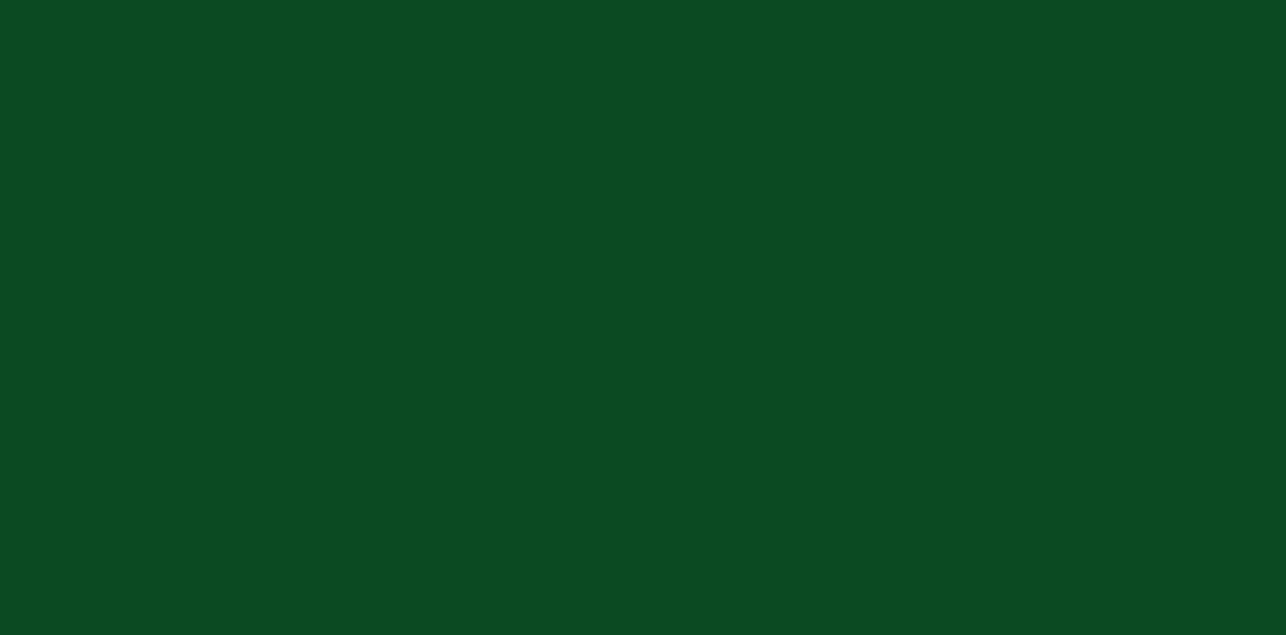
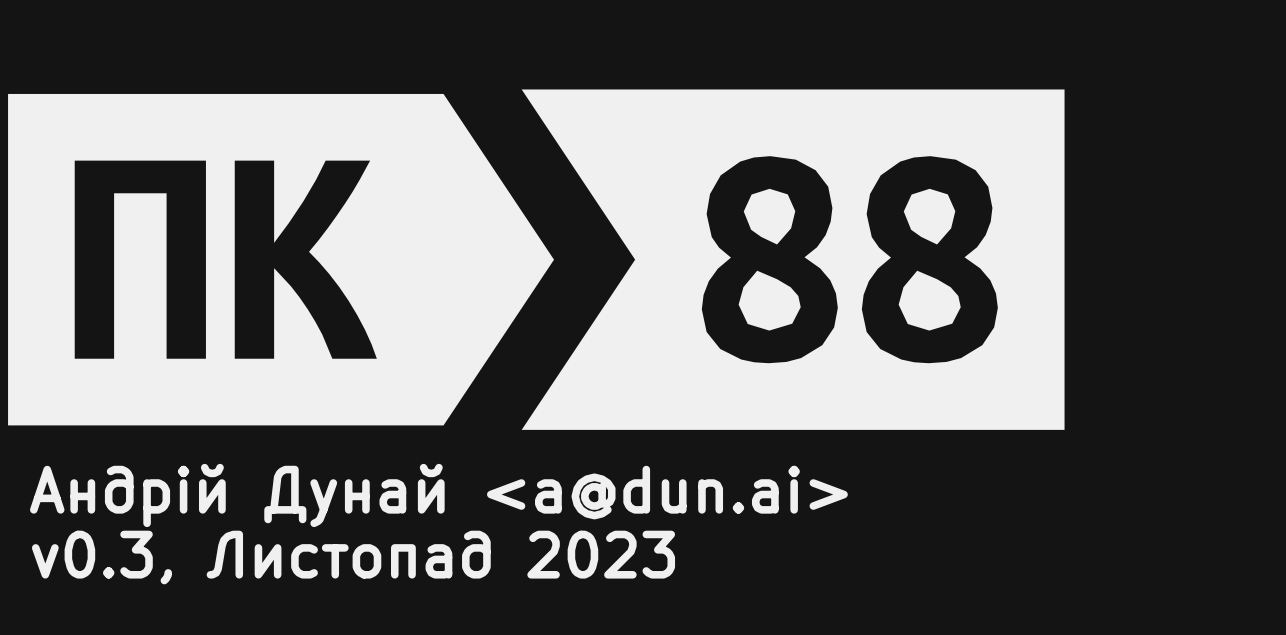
drawing: none -> [8, 89, 1065, 430]
text: none -> Андрій Дунай <a@dun.ai> (438, 495)
text: none -> v0.3, Листопад 2023 (353, 557)

